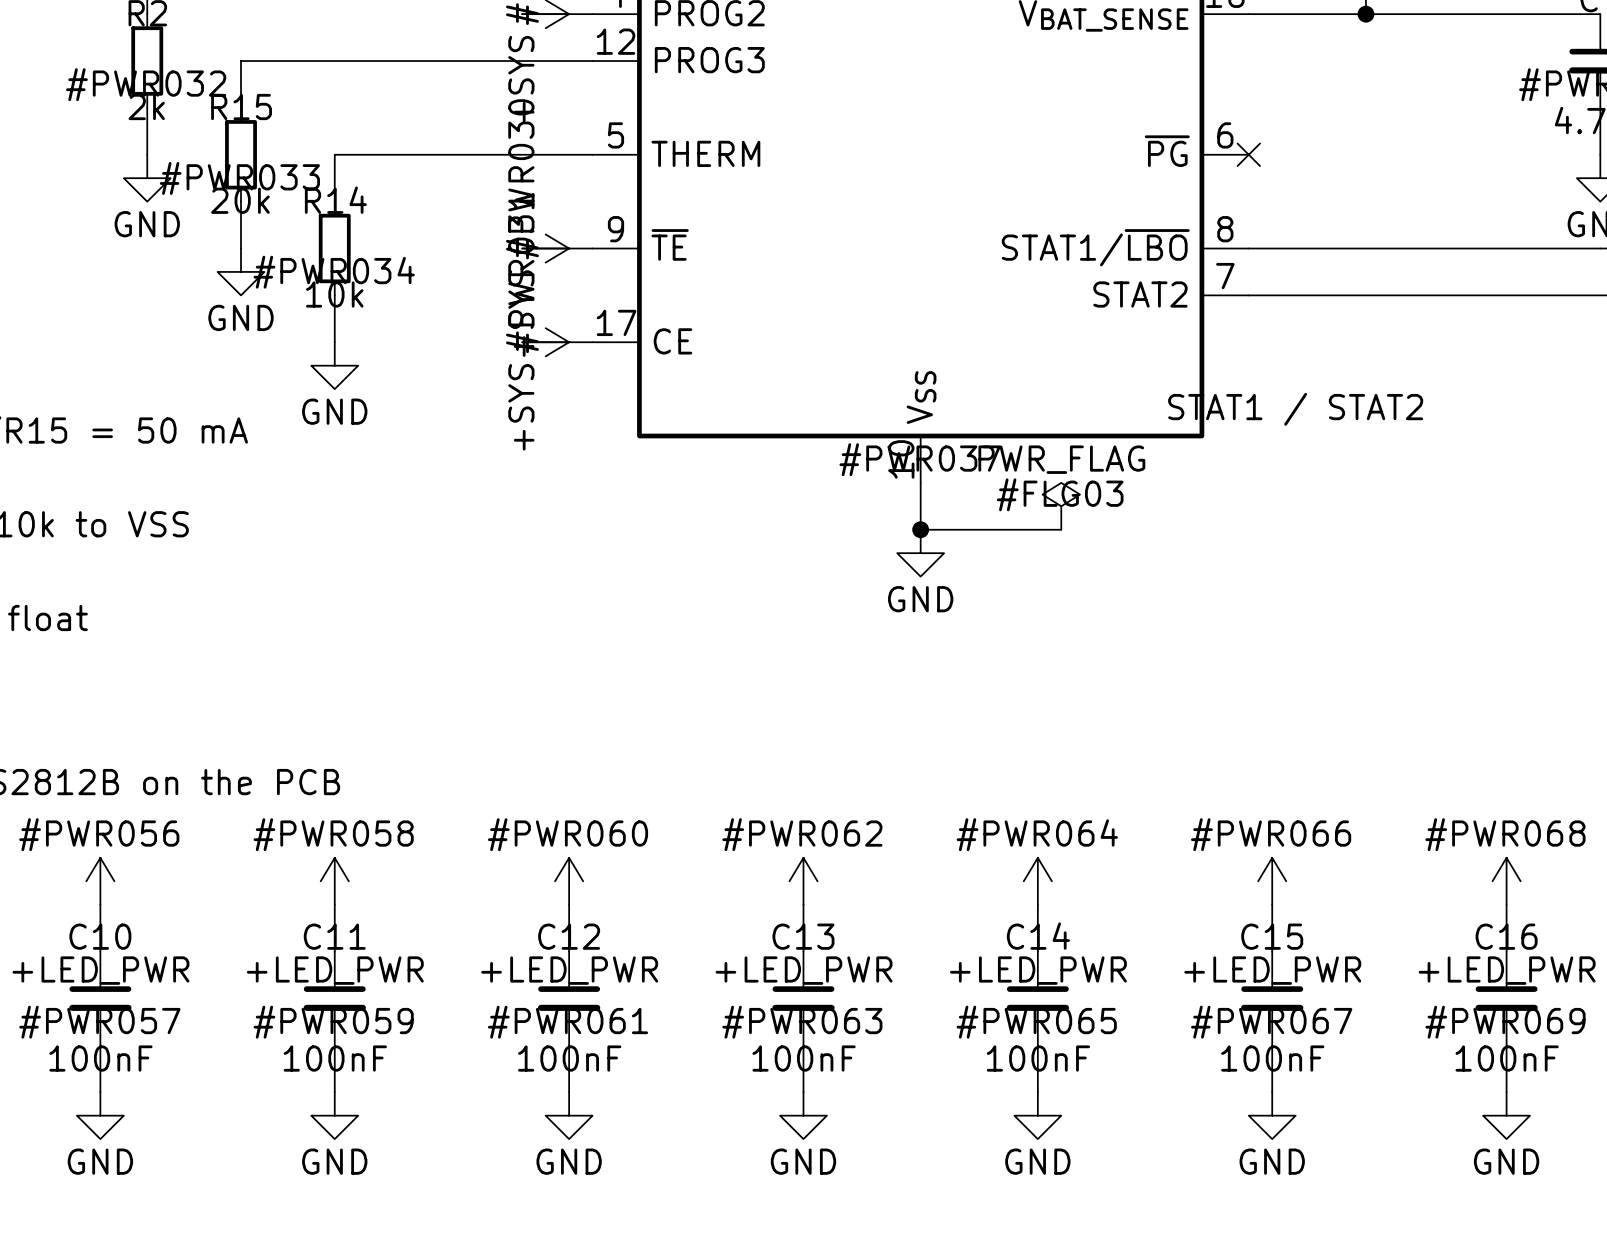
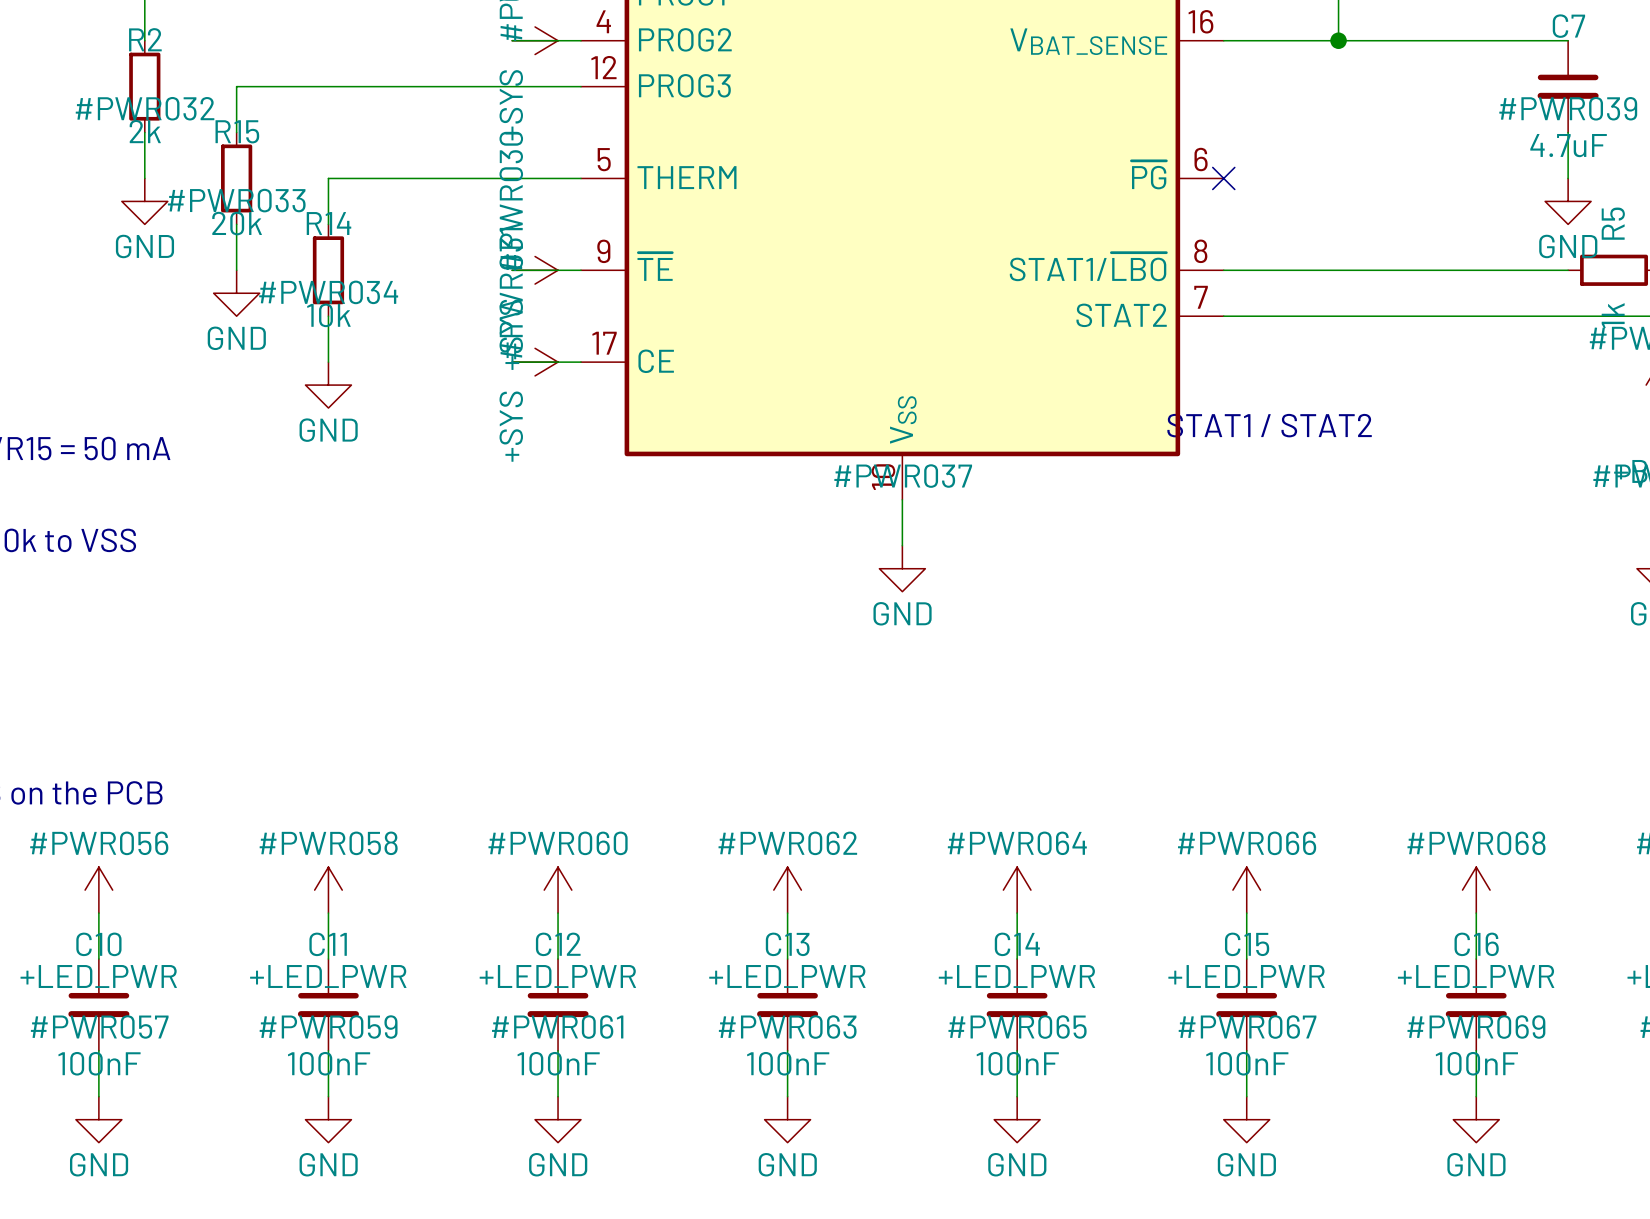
#FLG03: PWR_FLAG (1061, 506) -> none
wire: (920, 529) (1061, 529) -> none
junction: (920, 529) -> none

